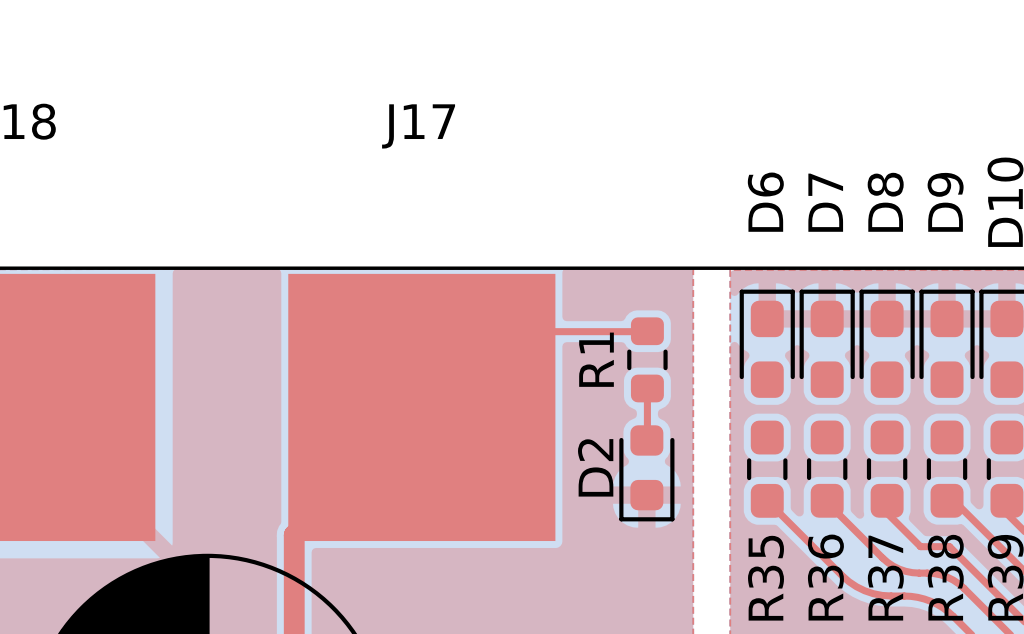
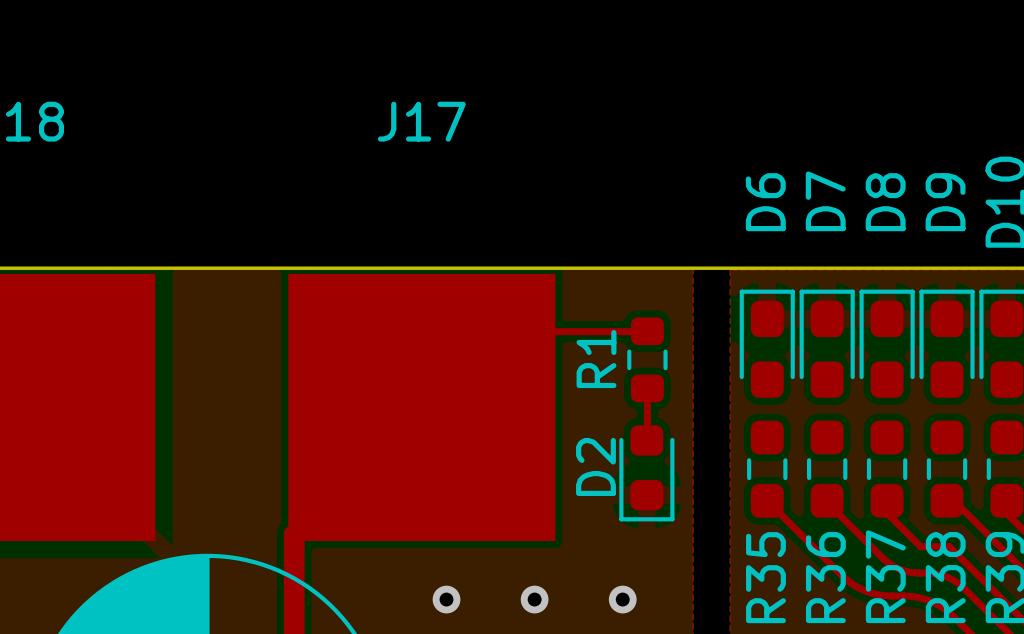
via: none -> (446, 599)
via: none -> (534, 599)
via: none -> (622, 599)

